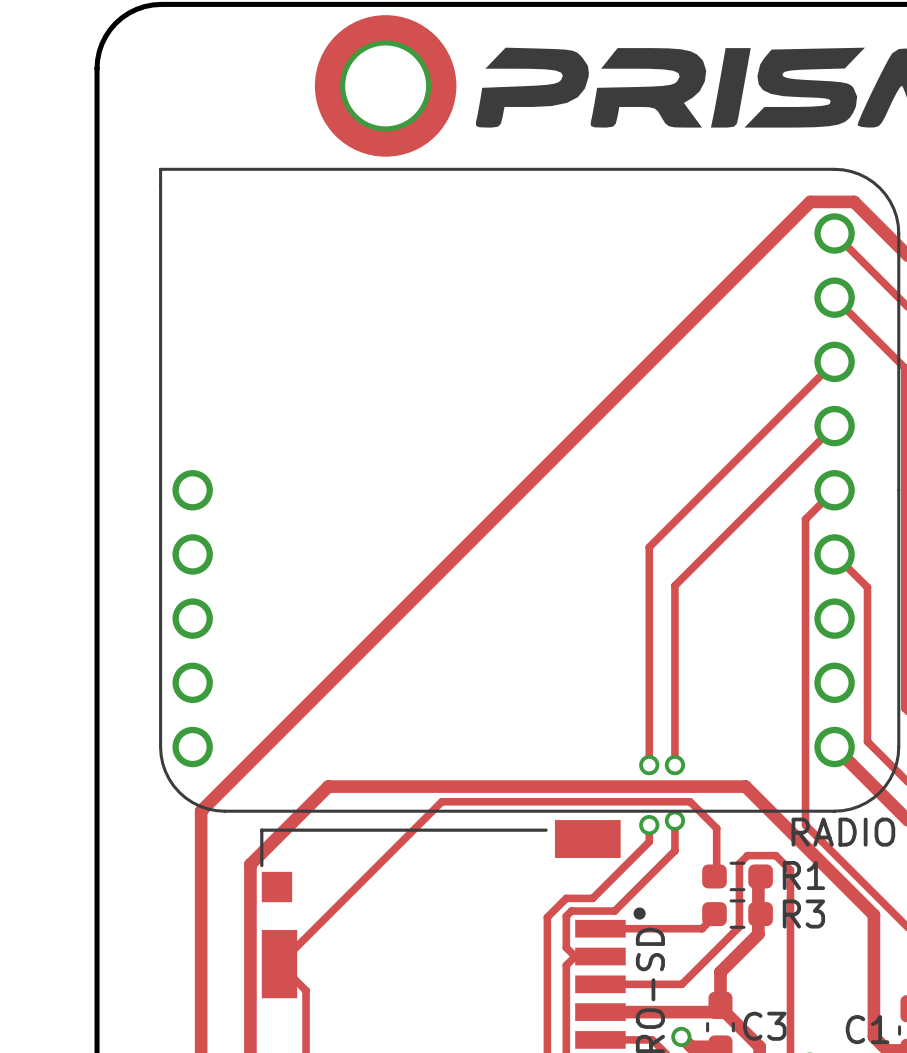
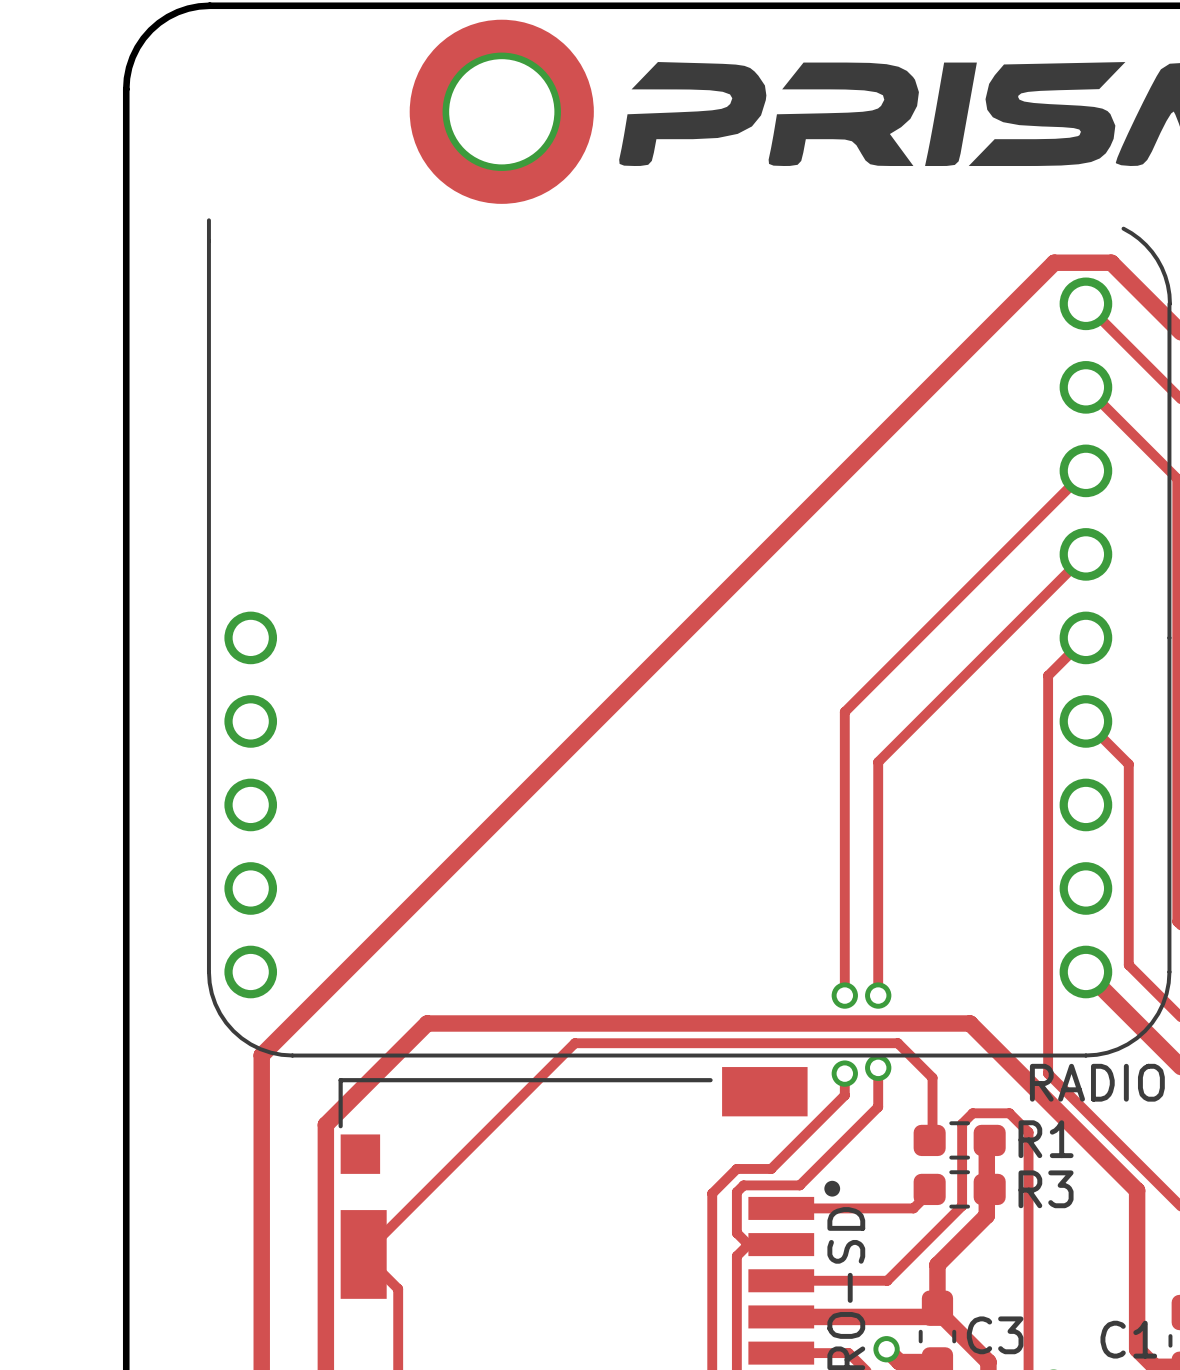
part footprint: [159, 167, 901, 813] -> [206, 218, 1172, 1058]

